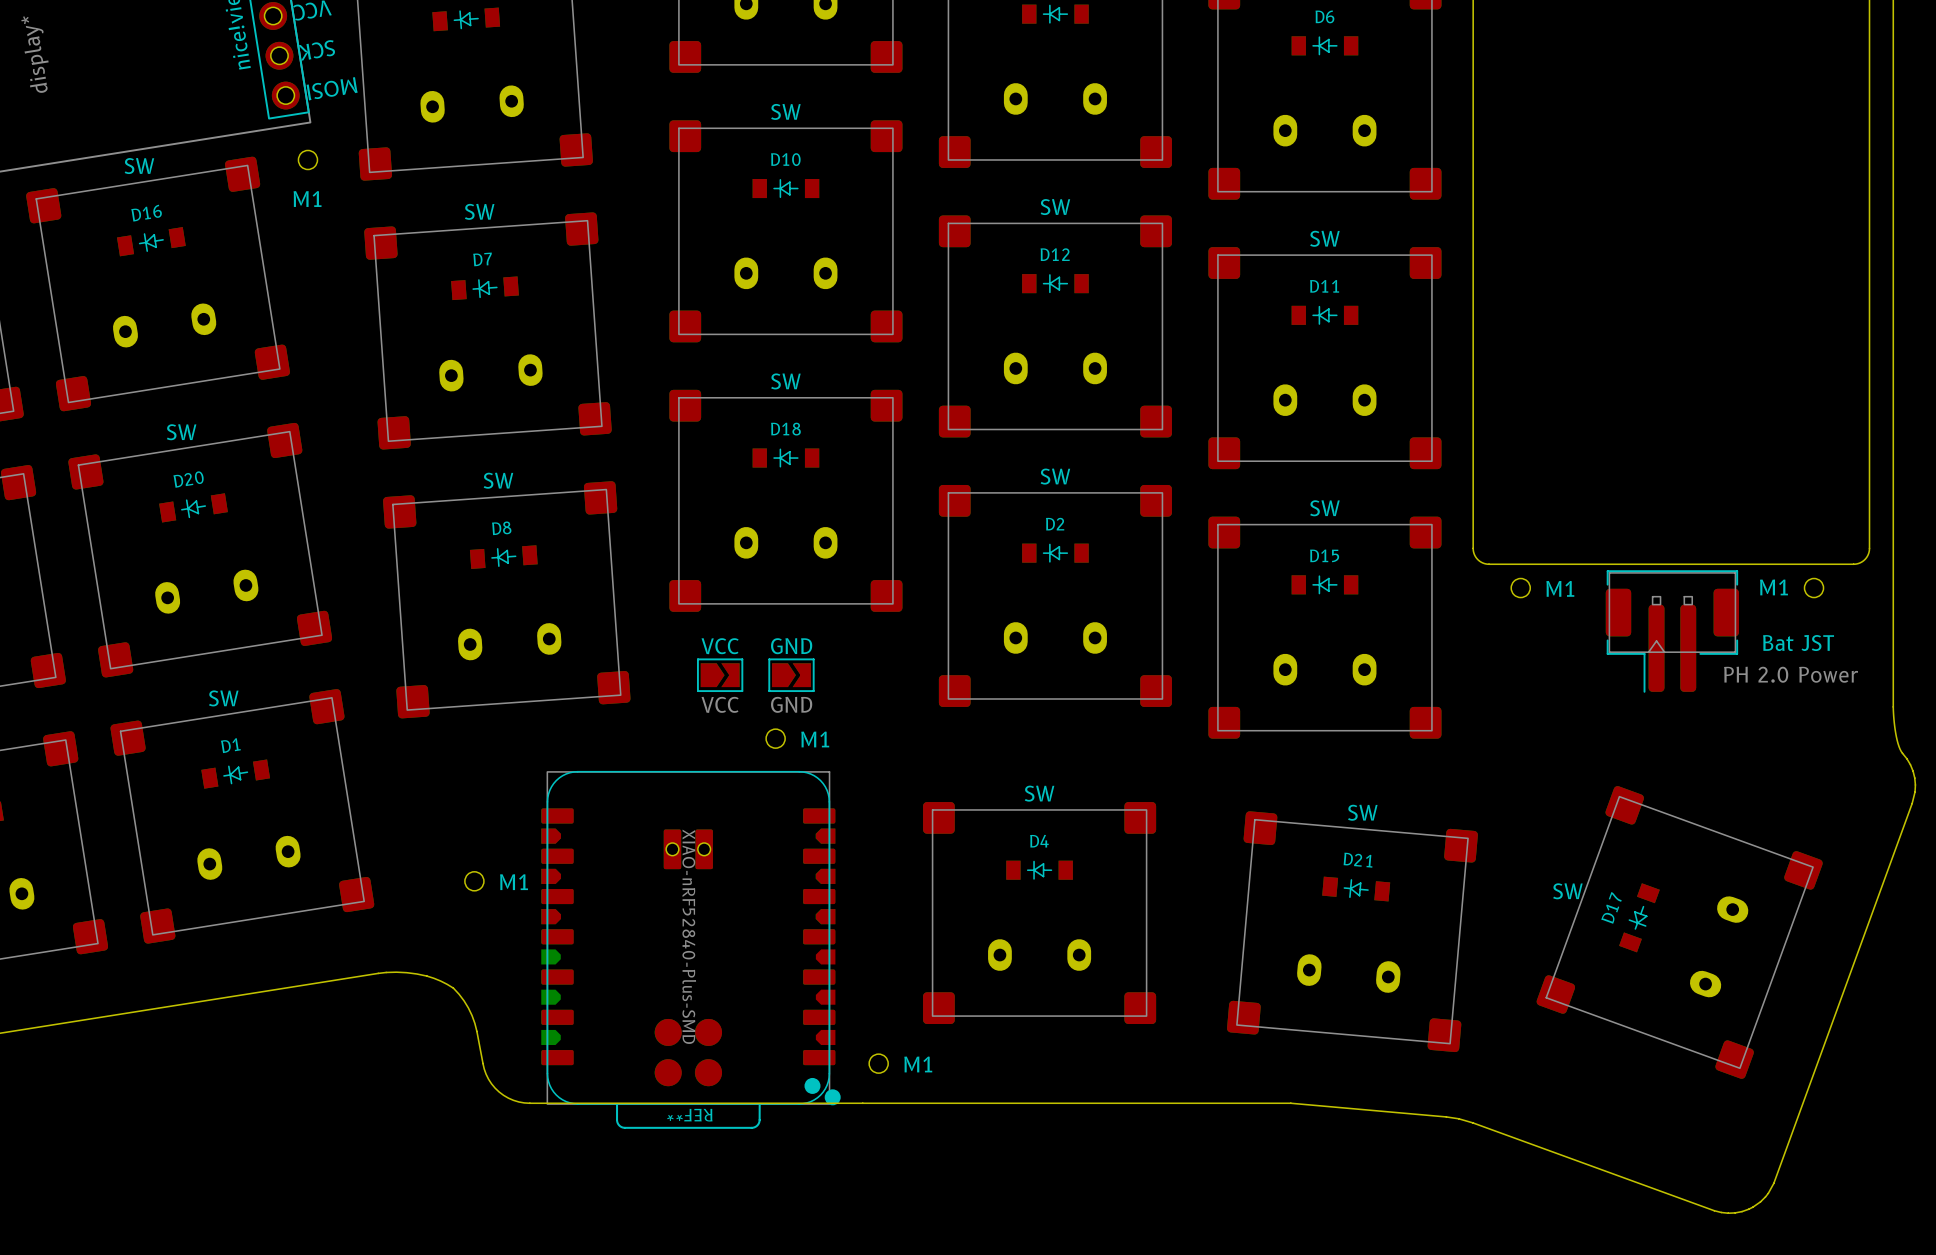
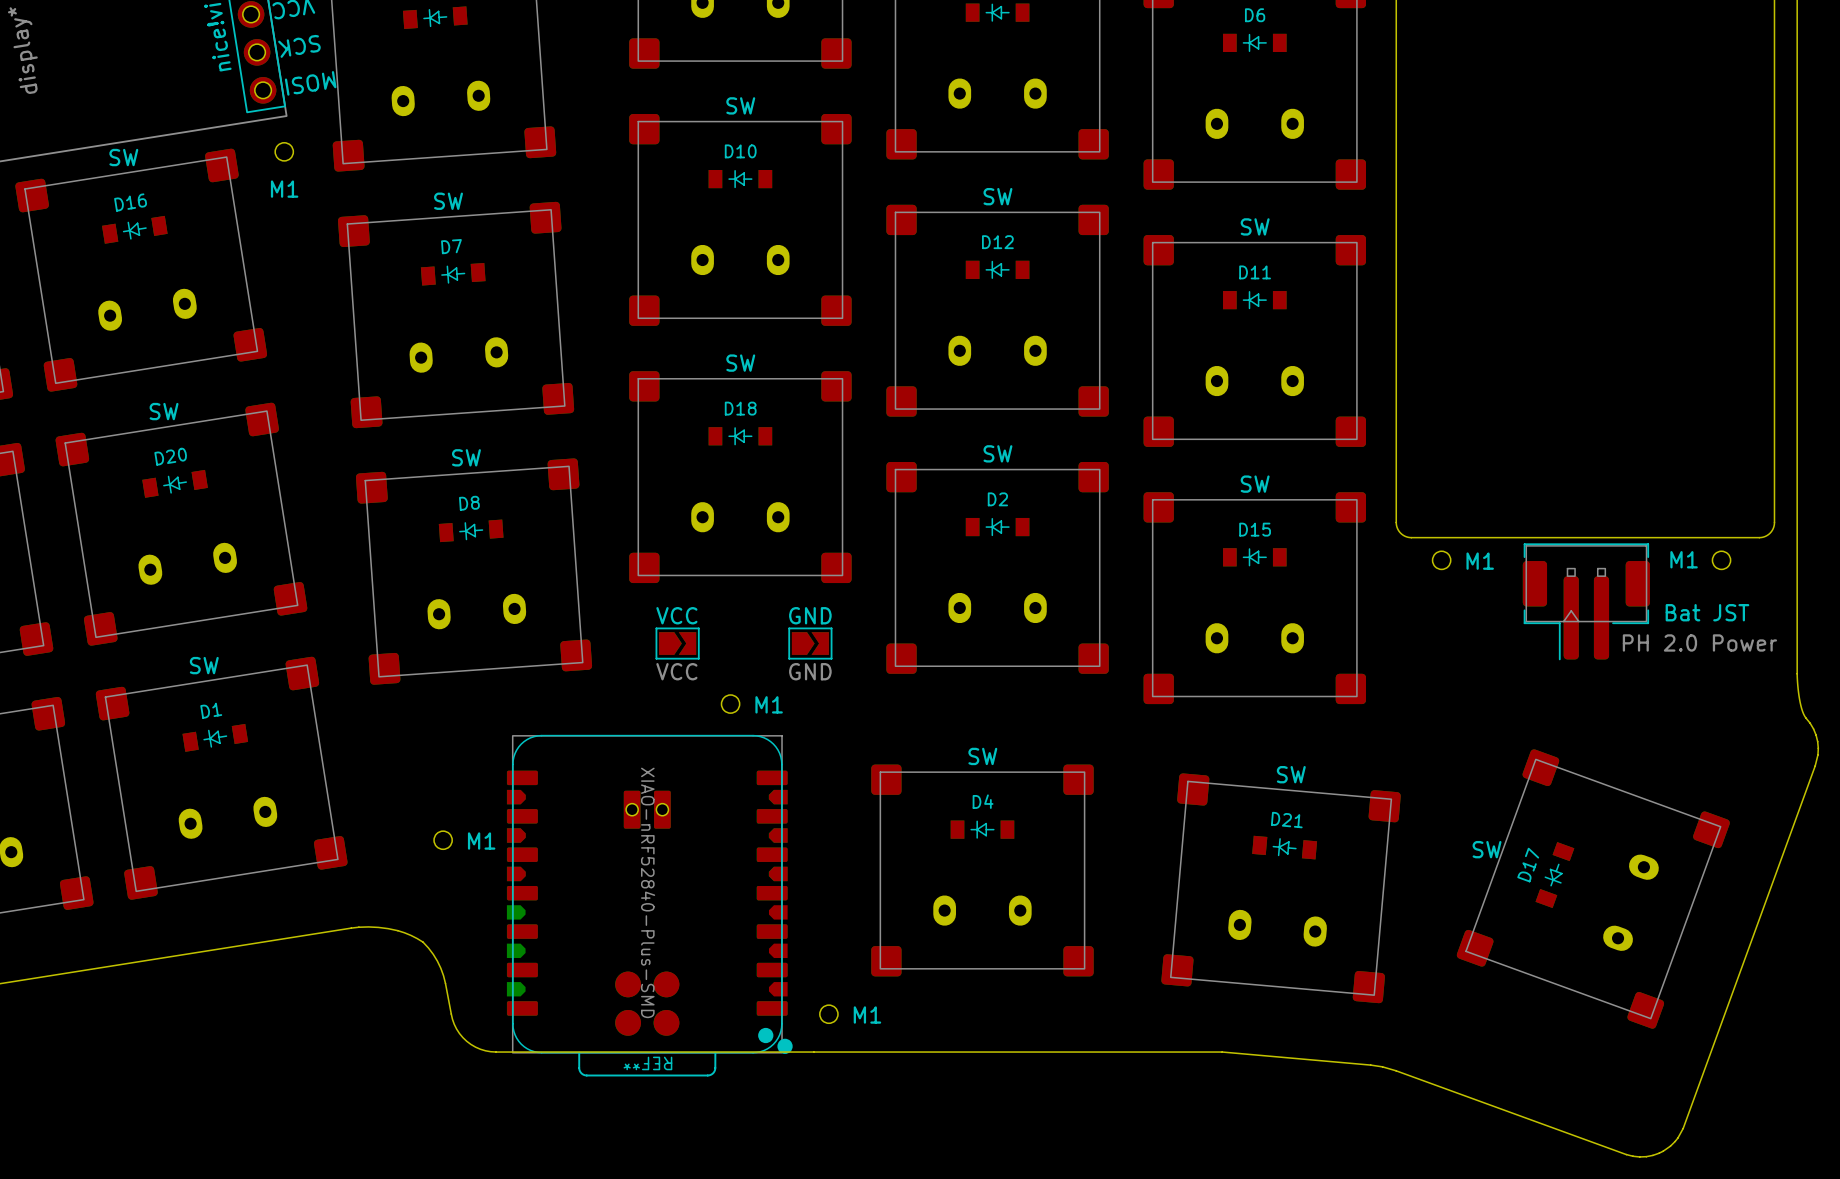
GND position: (791, 675) -> (810, 643)

